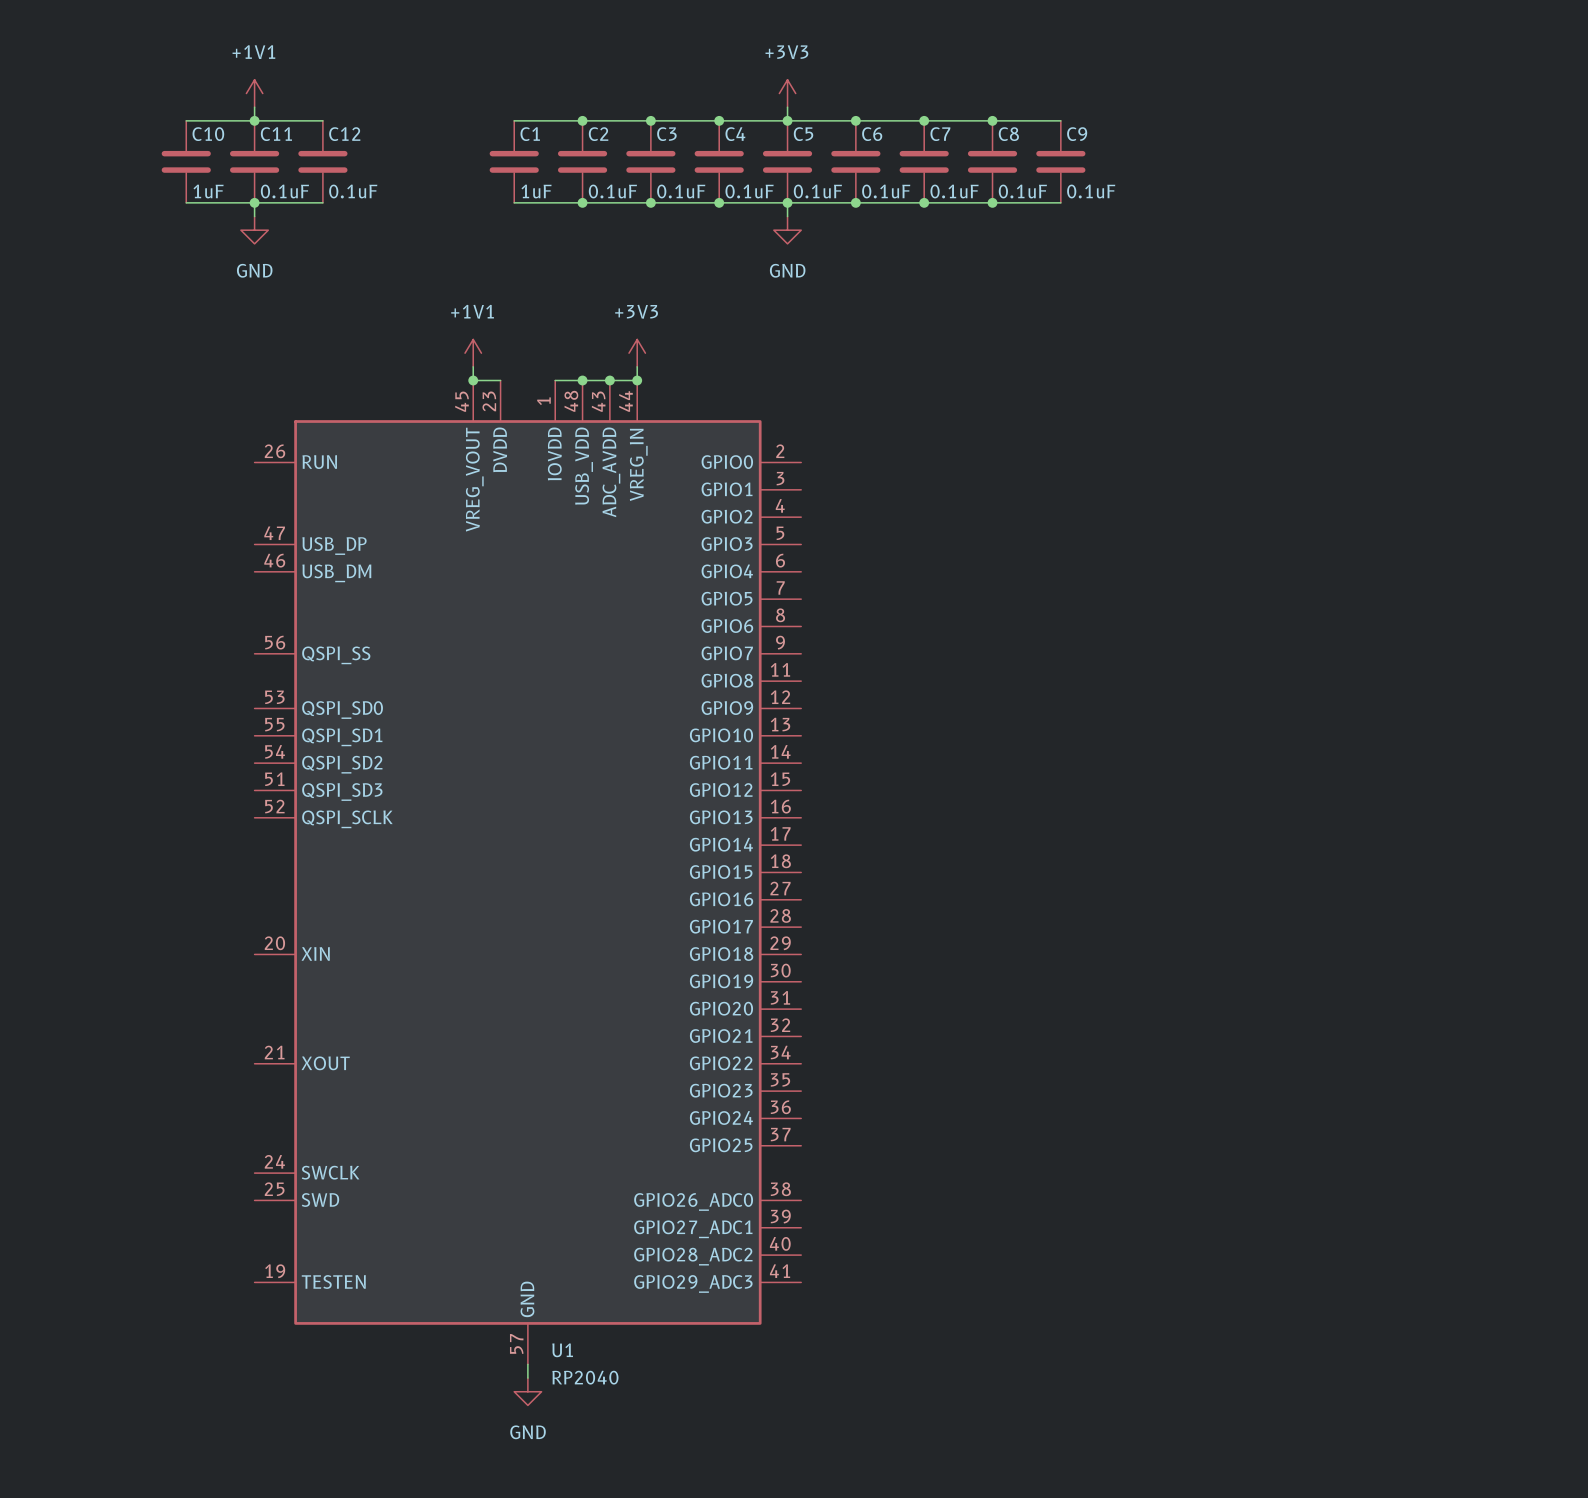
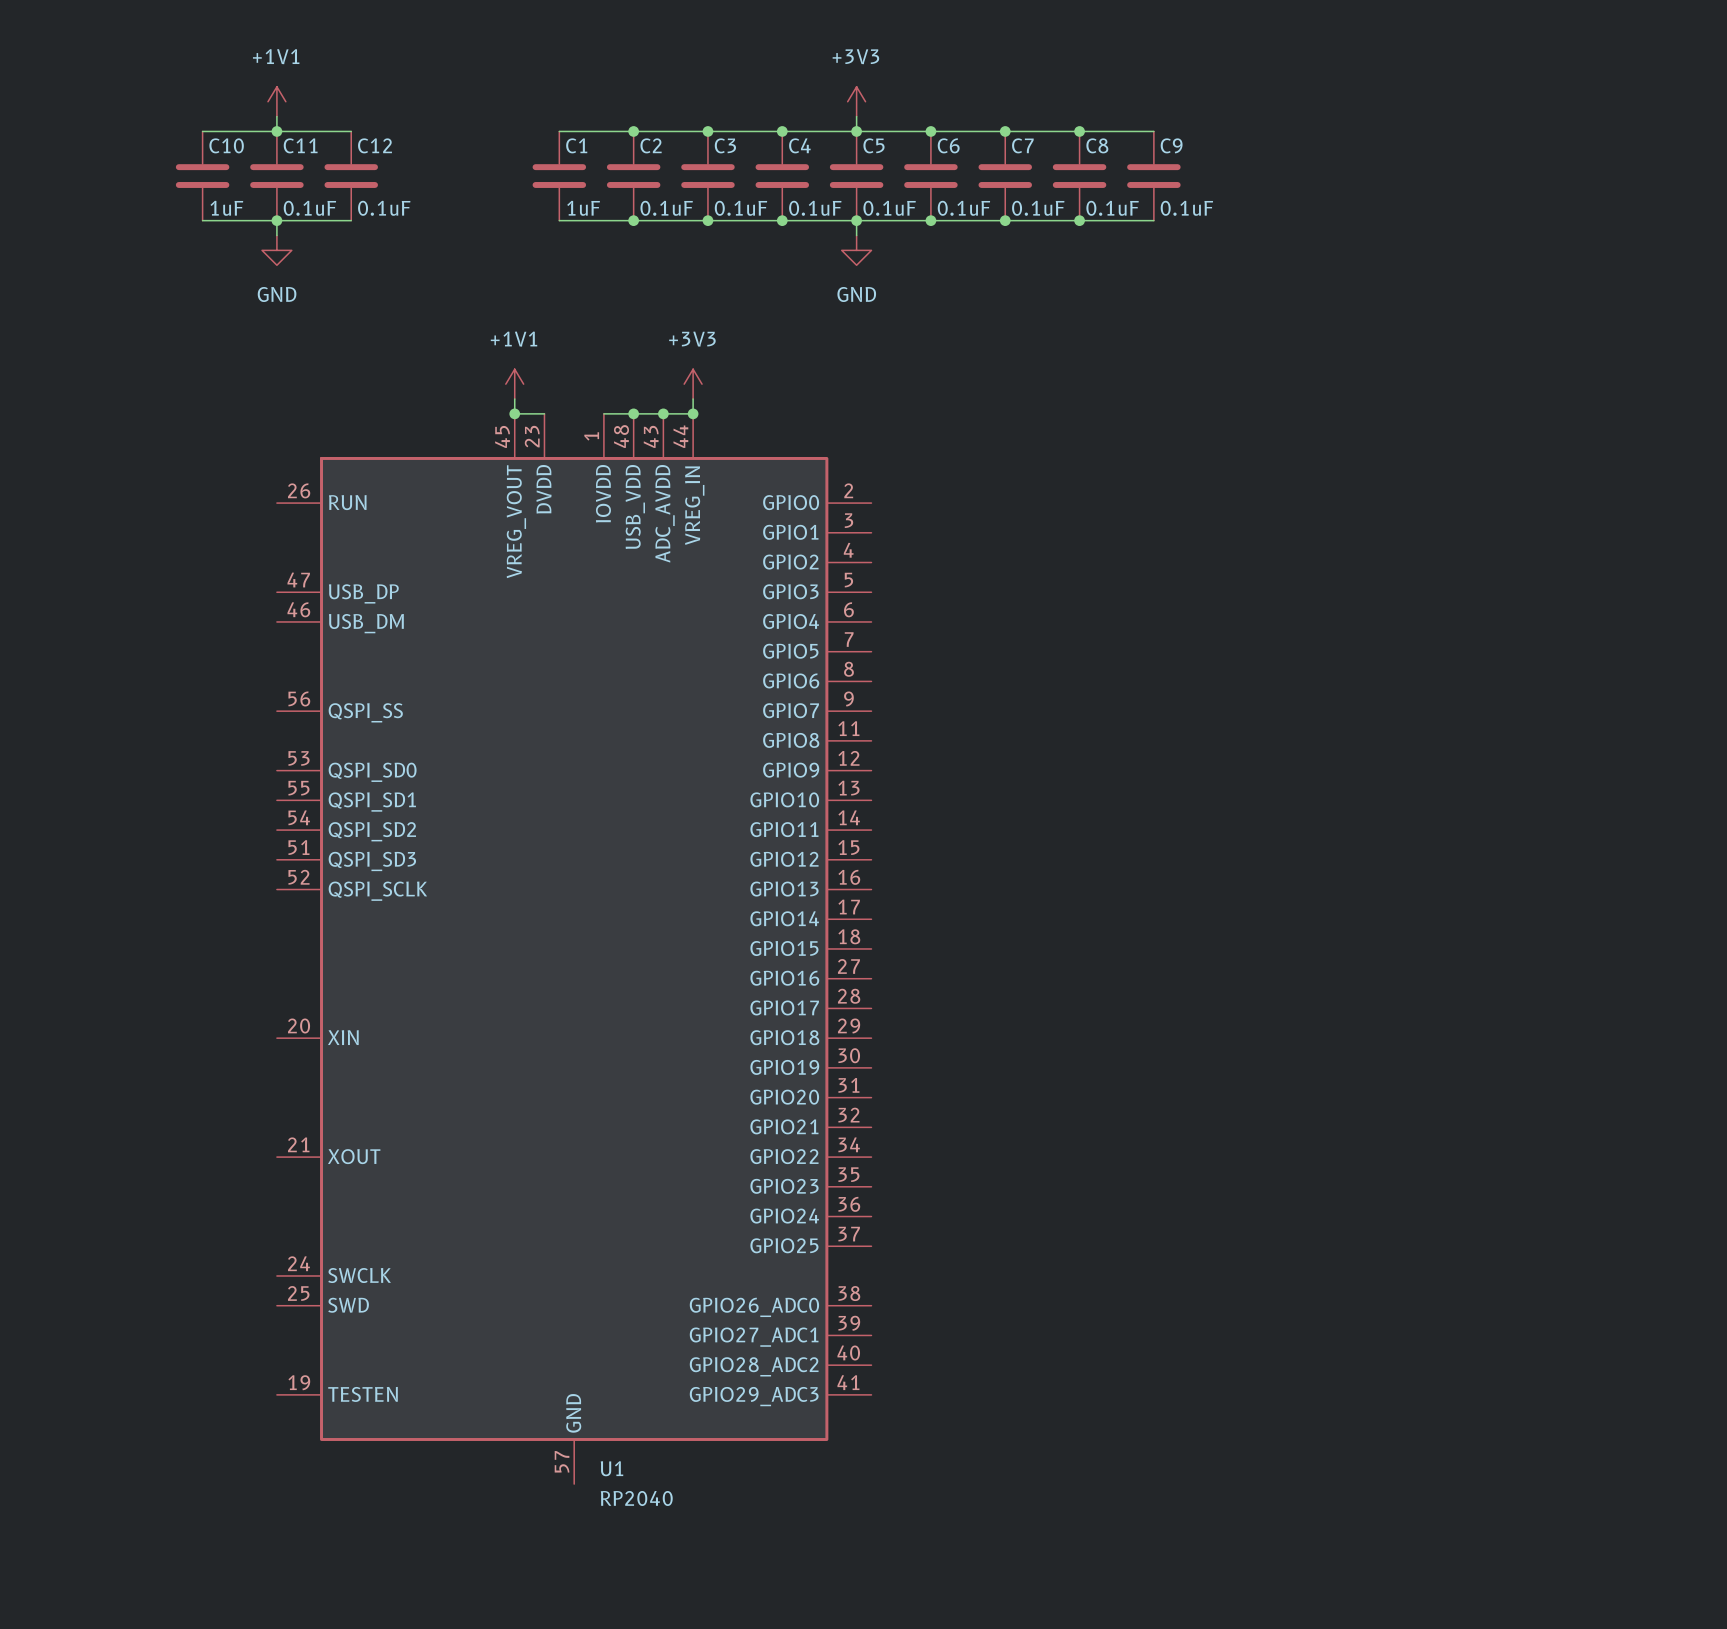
wire: (527, 1364) (527, 1378) -> none
power symbol: GND (527, 1391) -> none

